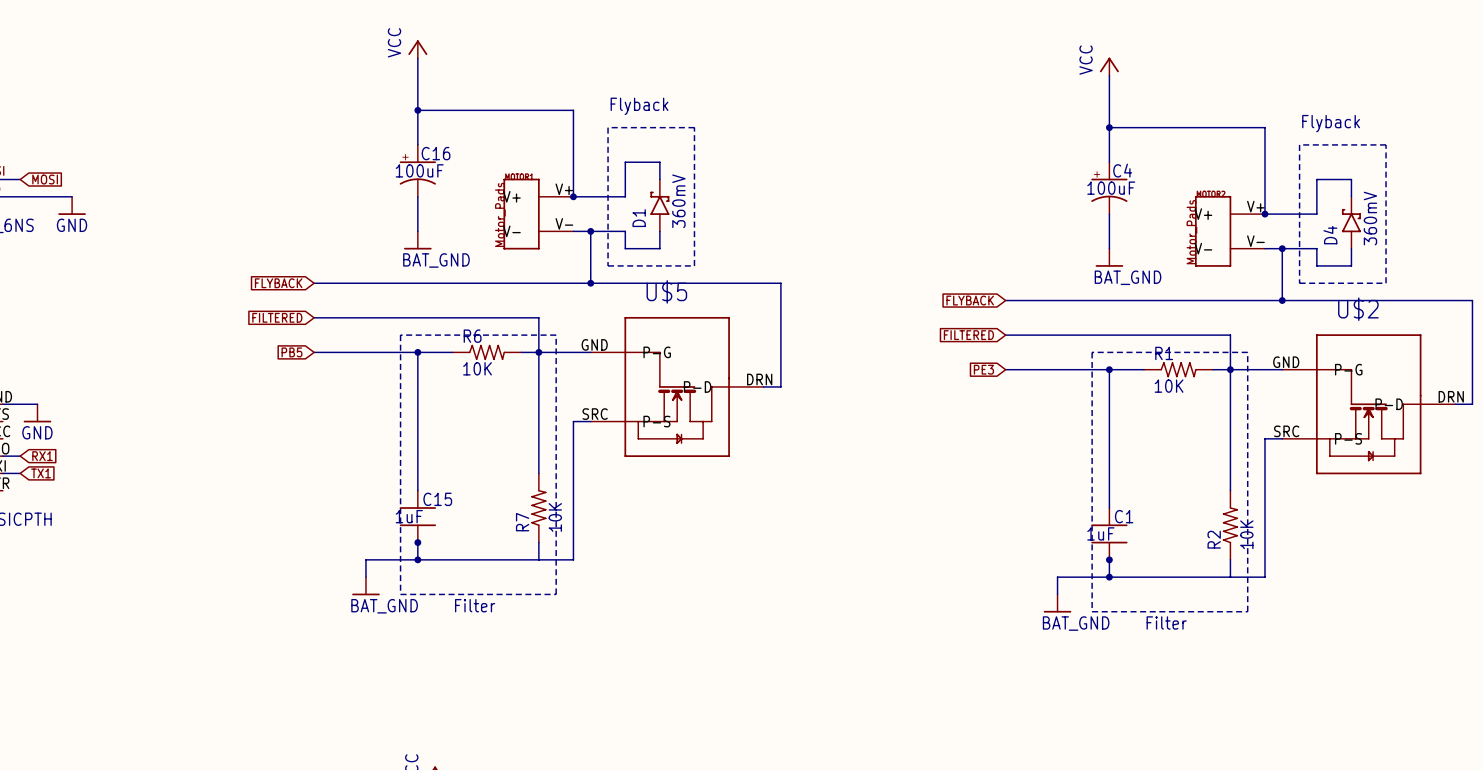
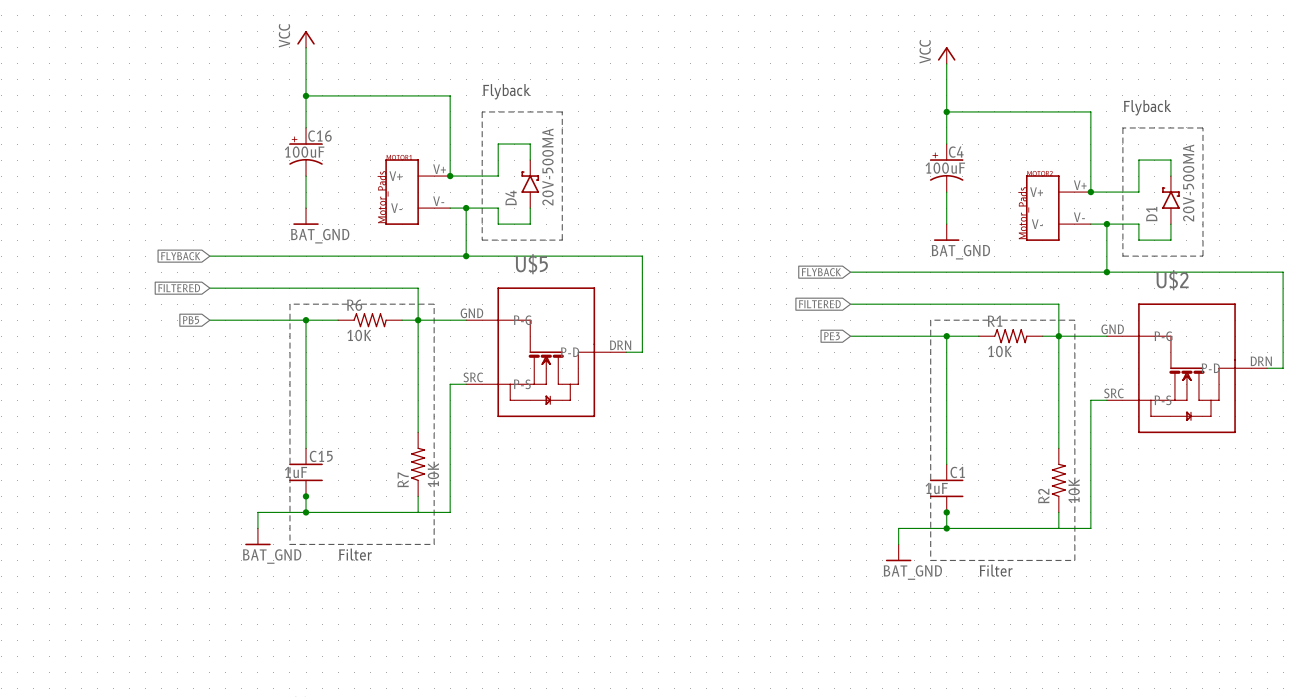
D1 value: 360mV (678, 201) -> 20V-500MA (547, 167)
D1 name: D1 (639, 218) -> D4 (511, 197)
D4 value: 360mV (1370, 218) -> 20V-500MA (1188, 183)
D4 name: D4 (1330, 235) -> D1 (1151, 214)

